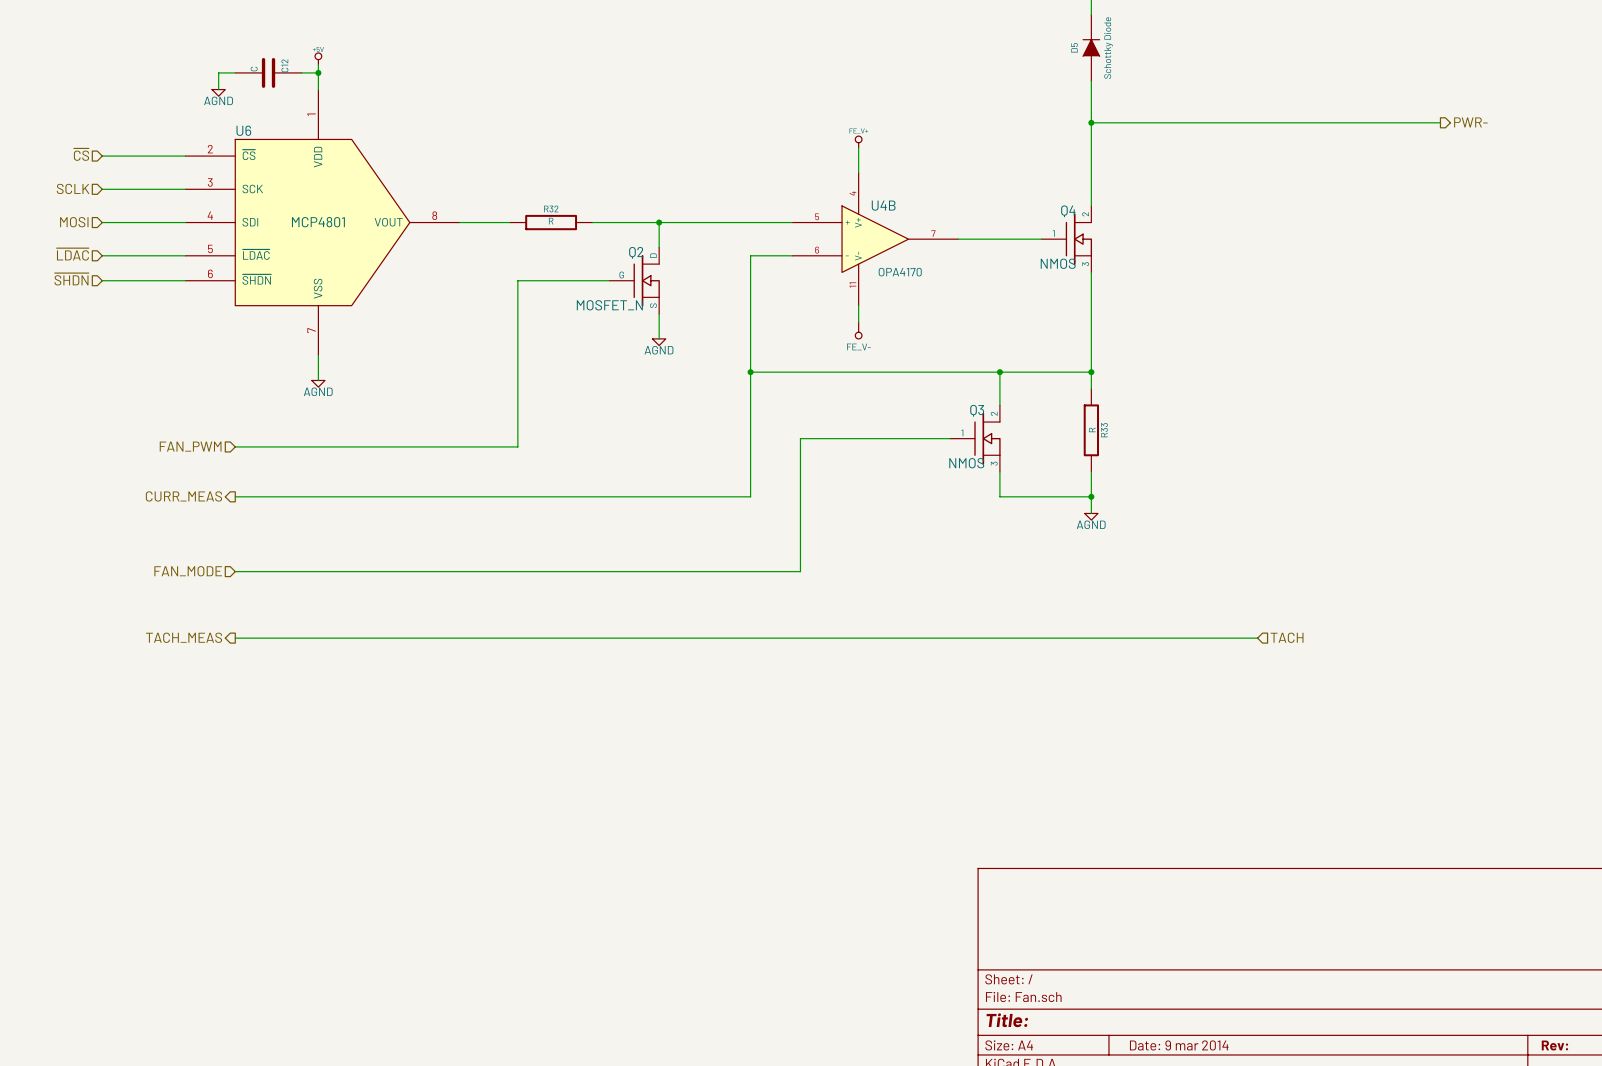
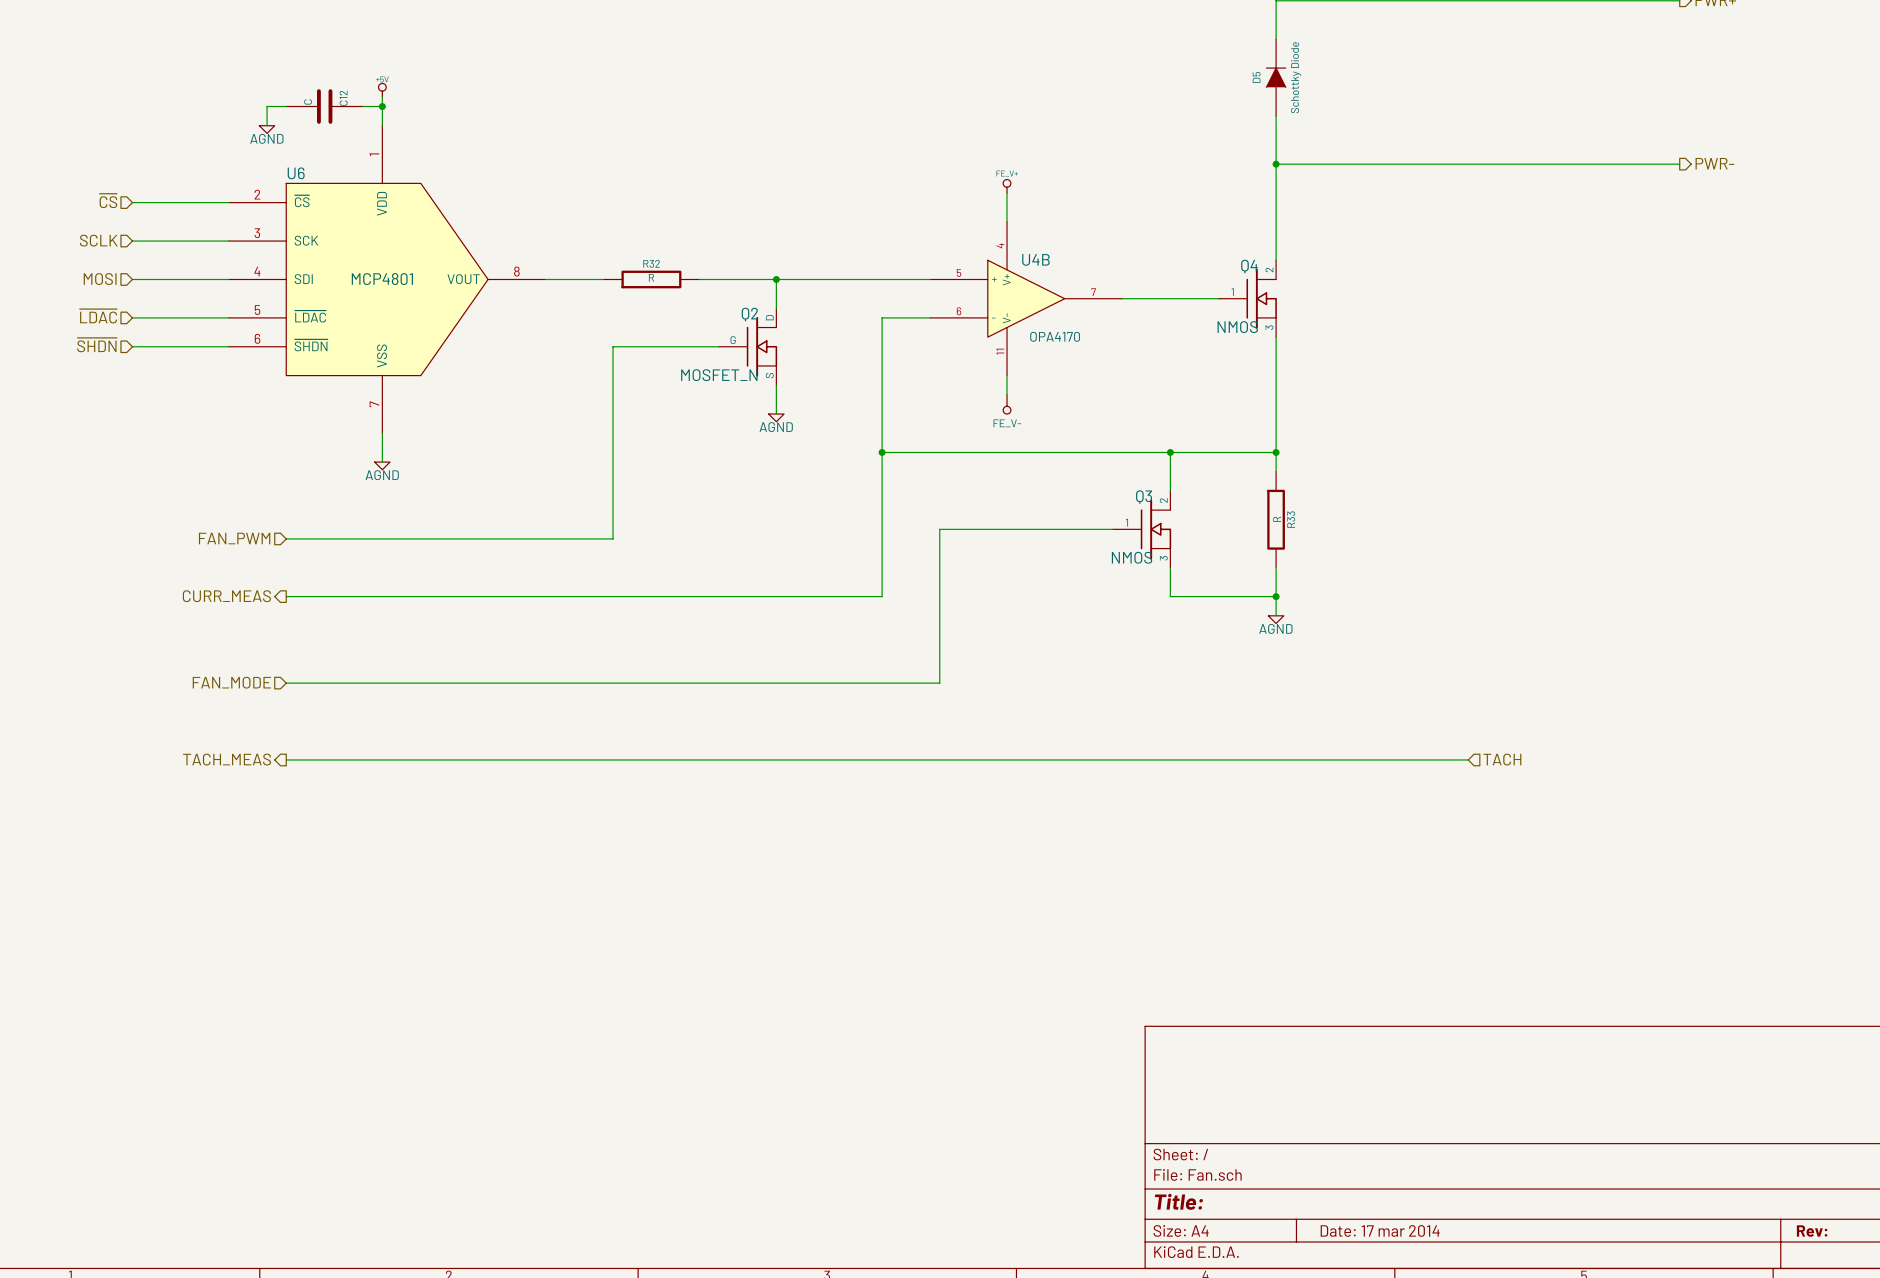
title block: Date: 9 mar 2014 (1179, 1045) -> Date: 17 mar 2014 (1380, 1230)

